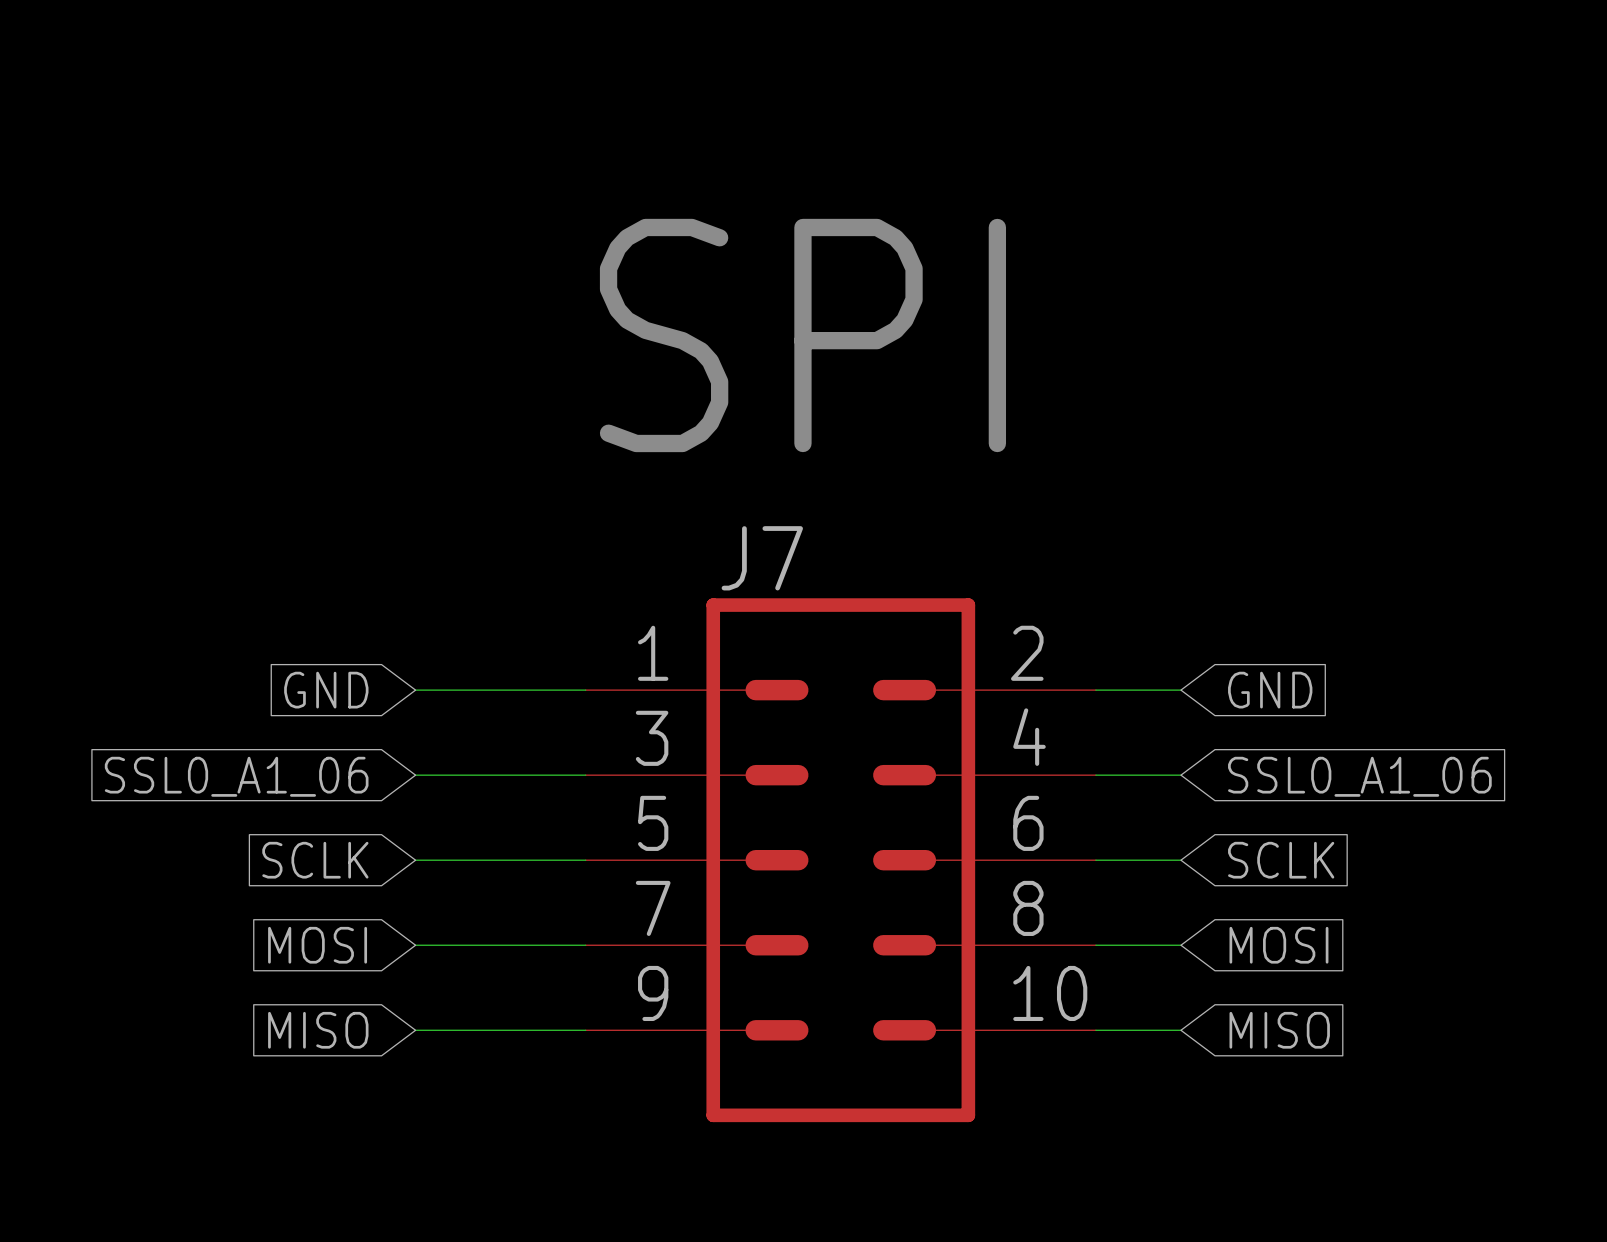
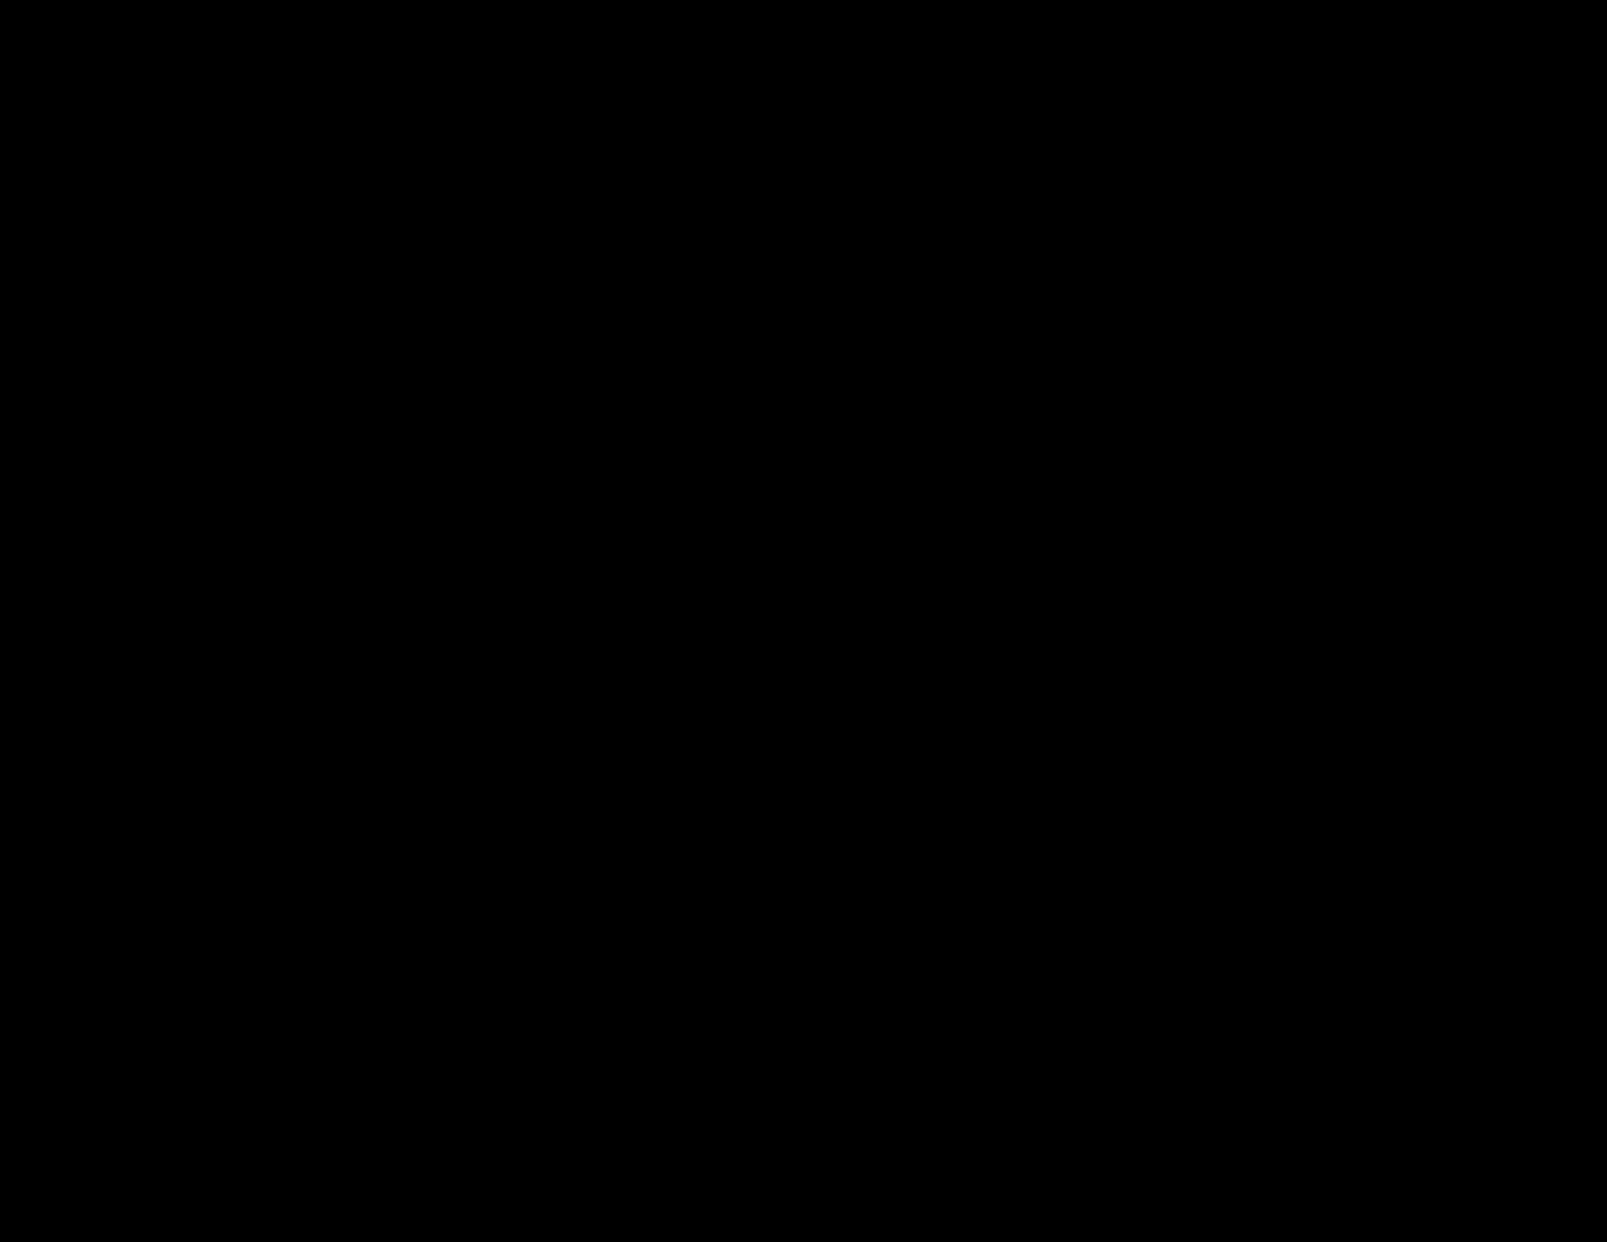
text: SPI (802, 335) -> none
global label: GND (326, 690) -> none
wire: (415, 690) (585, 690) -> none
wire: (1095, 690) (1180, 690) -> none
global label: GND (1270, 690) -> none
wire: (415, 775) (585, 775) -> none
wire: (1095, 775) (1180, 775) -> none
global label: SSL0_A1_06 (236, 776) -> none
global label: SSL0_A1_06 (1359, 776) -> none
global label: SCLK (315, 860) -> none
wire: (415, 860) (585, 860) -> none
J7: (840, 860) -> none
wire: (1095, 860) (1180, 860) -> none
global label: SCLK (1281, 860) -> none
global label: MOSI (317, 945) -> none
wire: (415, 945) (585, 945) -> none
wire: (1095, 945) (1180, 945) -> none
global label: MOSI (1278, 945) -> none
global label: MISO (318, 1030) -> none
wire: (415, 1030) (585, 1030) -> none
wire: (1095, 1030) (1180, 1030) -> none
global label: MISO (1279, 1030) -> none

